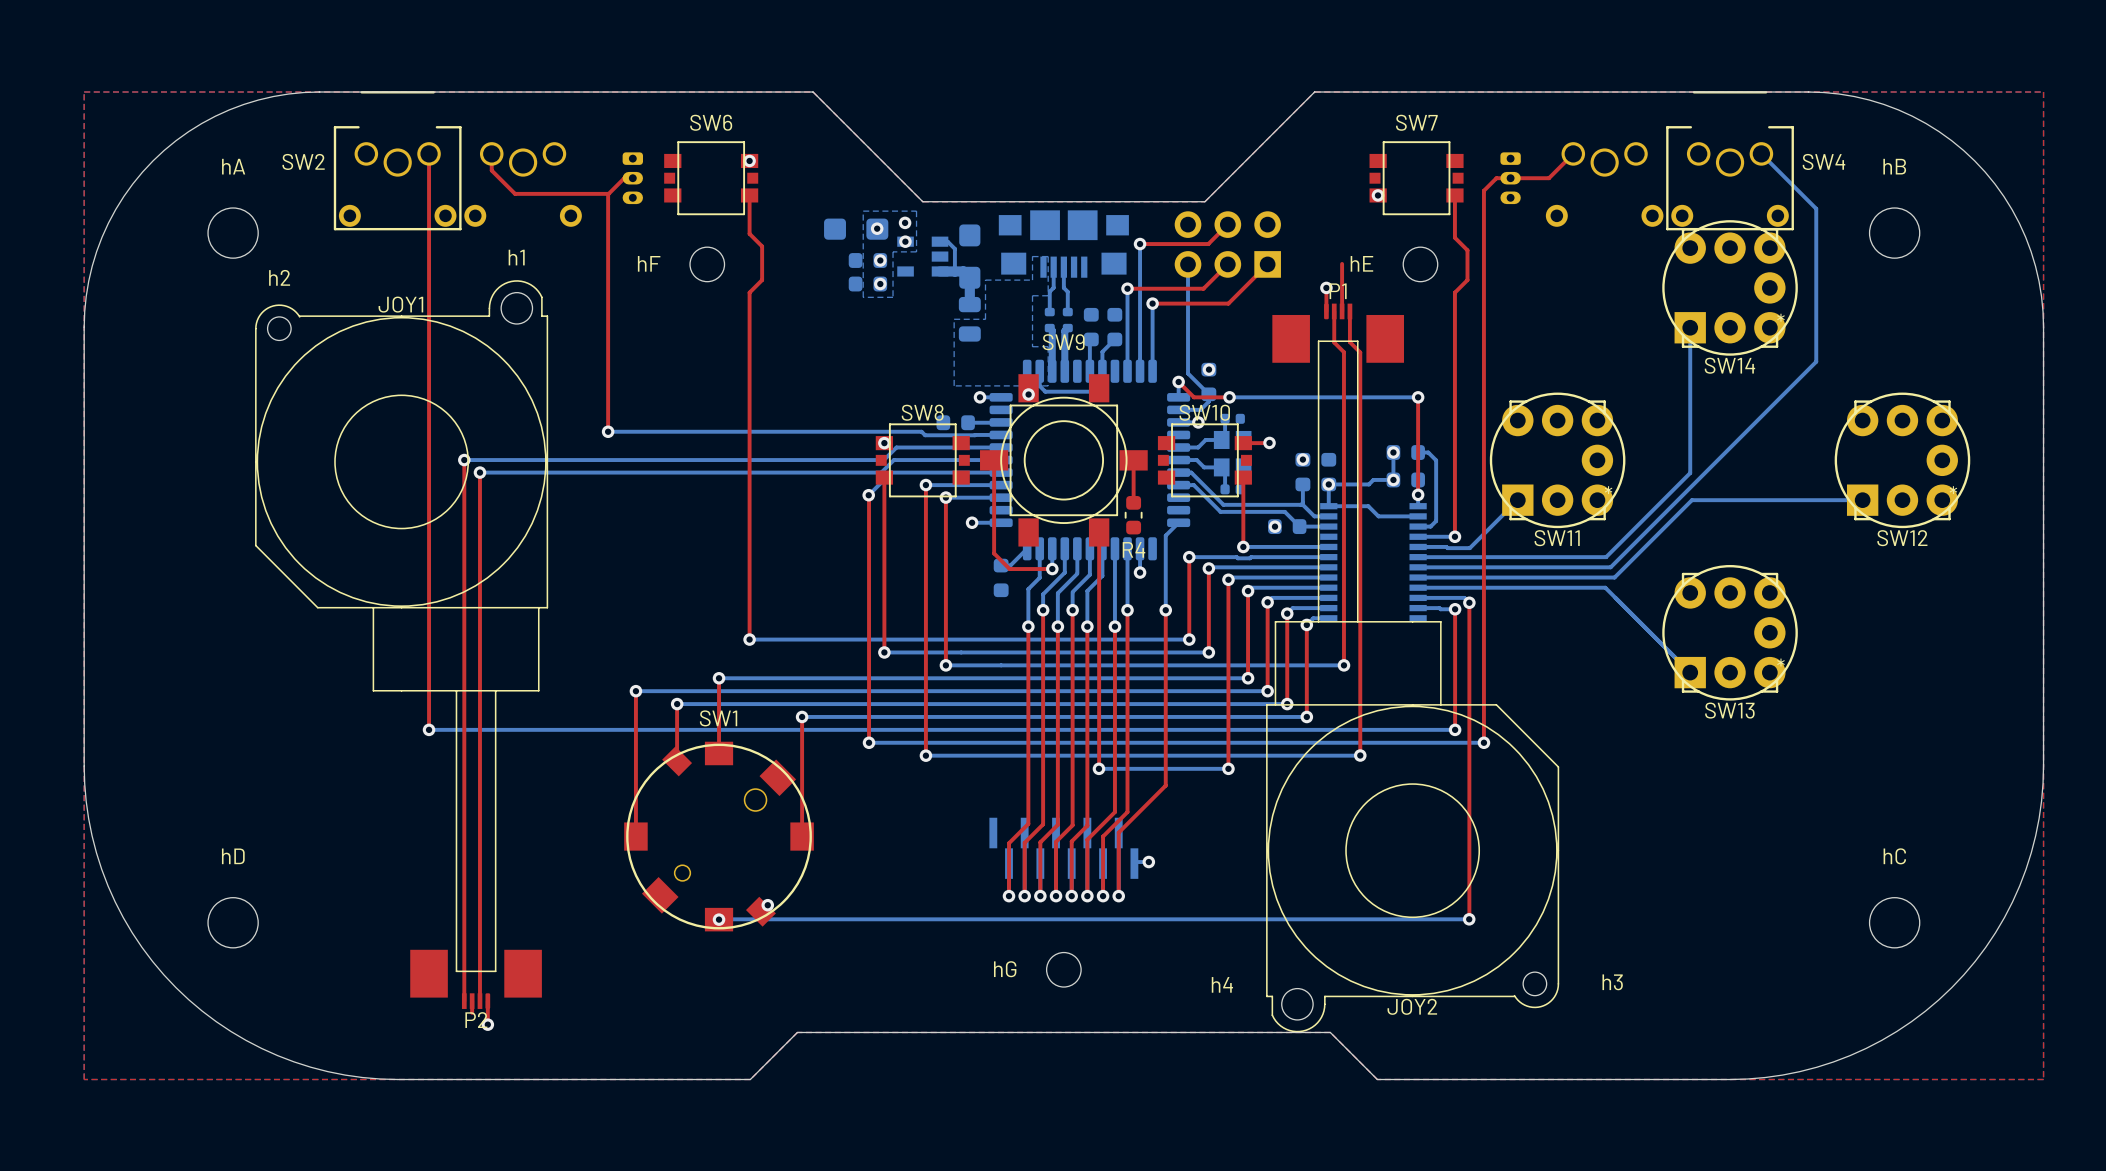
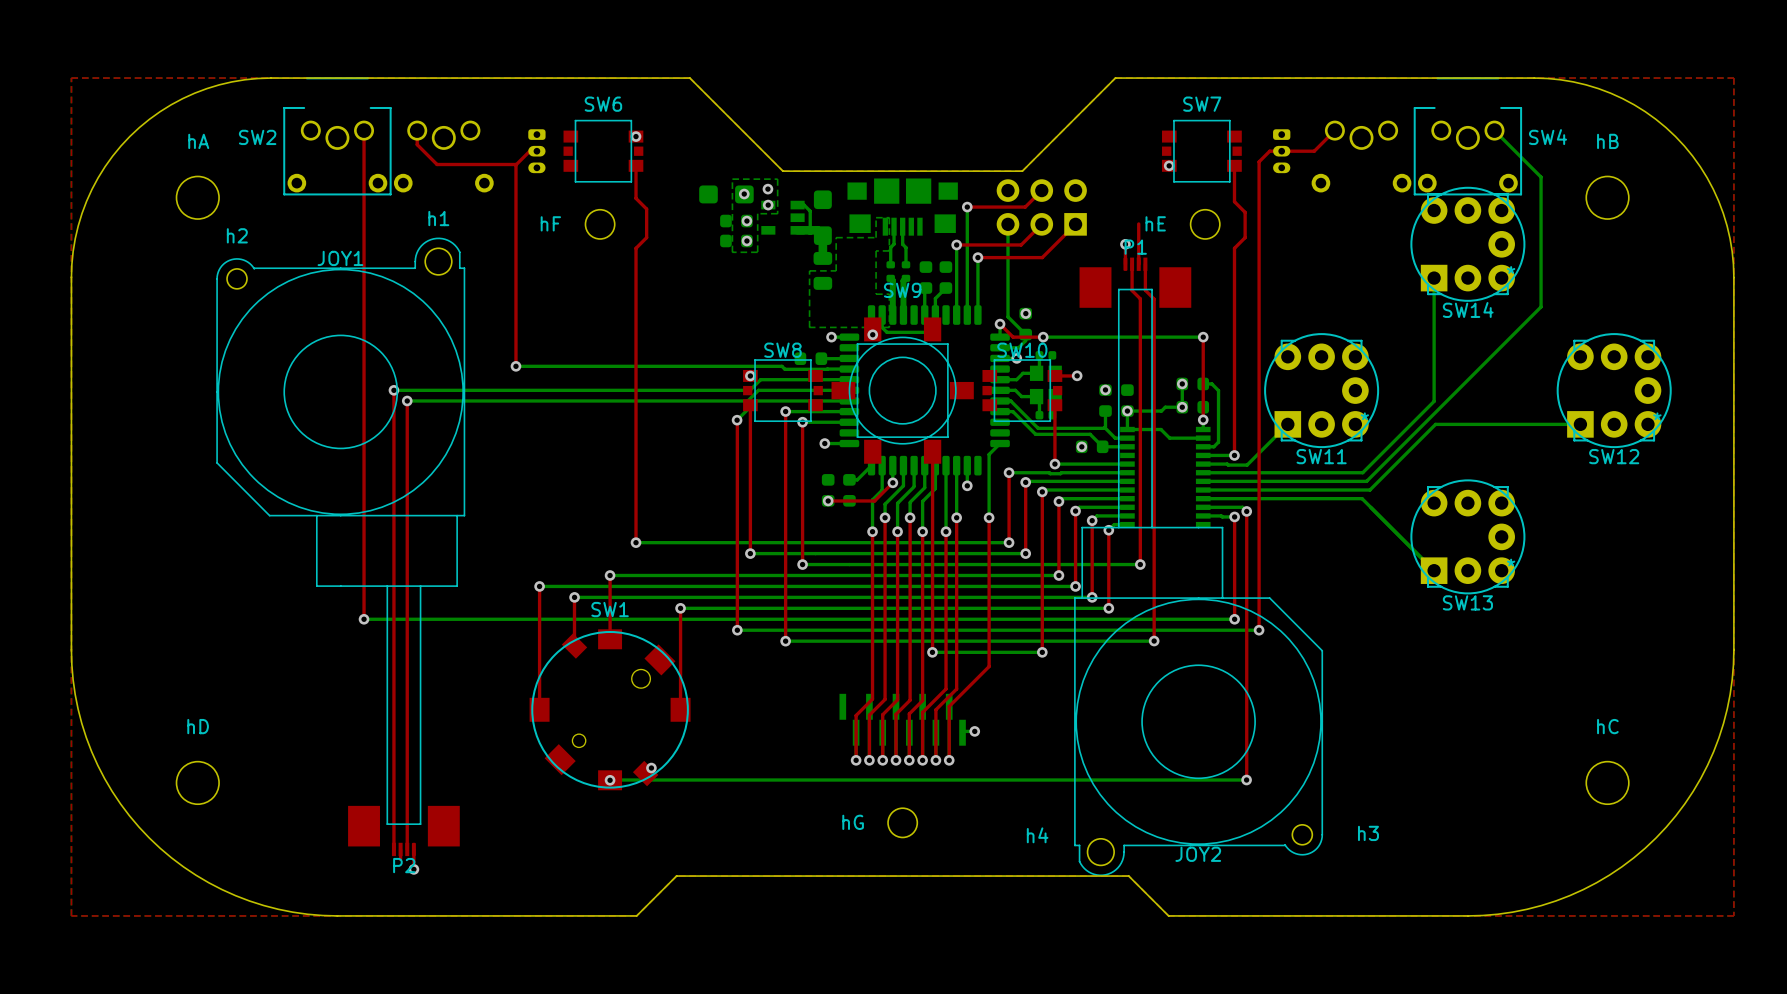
top track: (994, 460) (994, 553) (1009, 569) (1052, 569) -> (828, 500) (874, 500) (892, 482)
top track: (1133, 460) (1133, 502) -> none
R4 side: top (1133, 515) -> bottom (828, 490)
via: none -> (828, 500)

